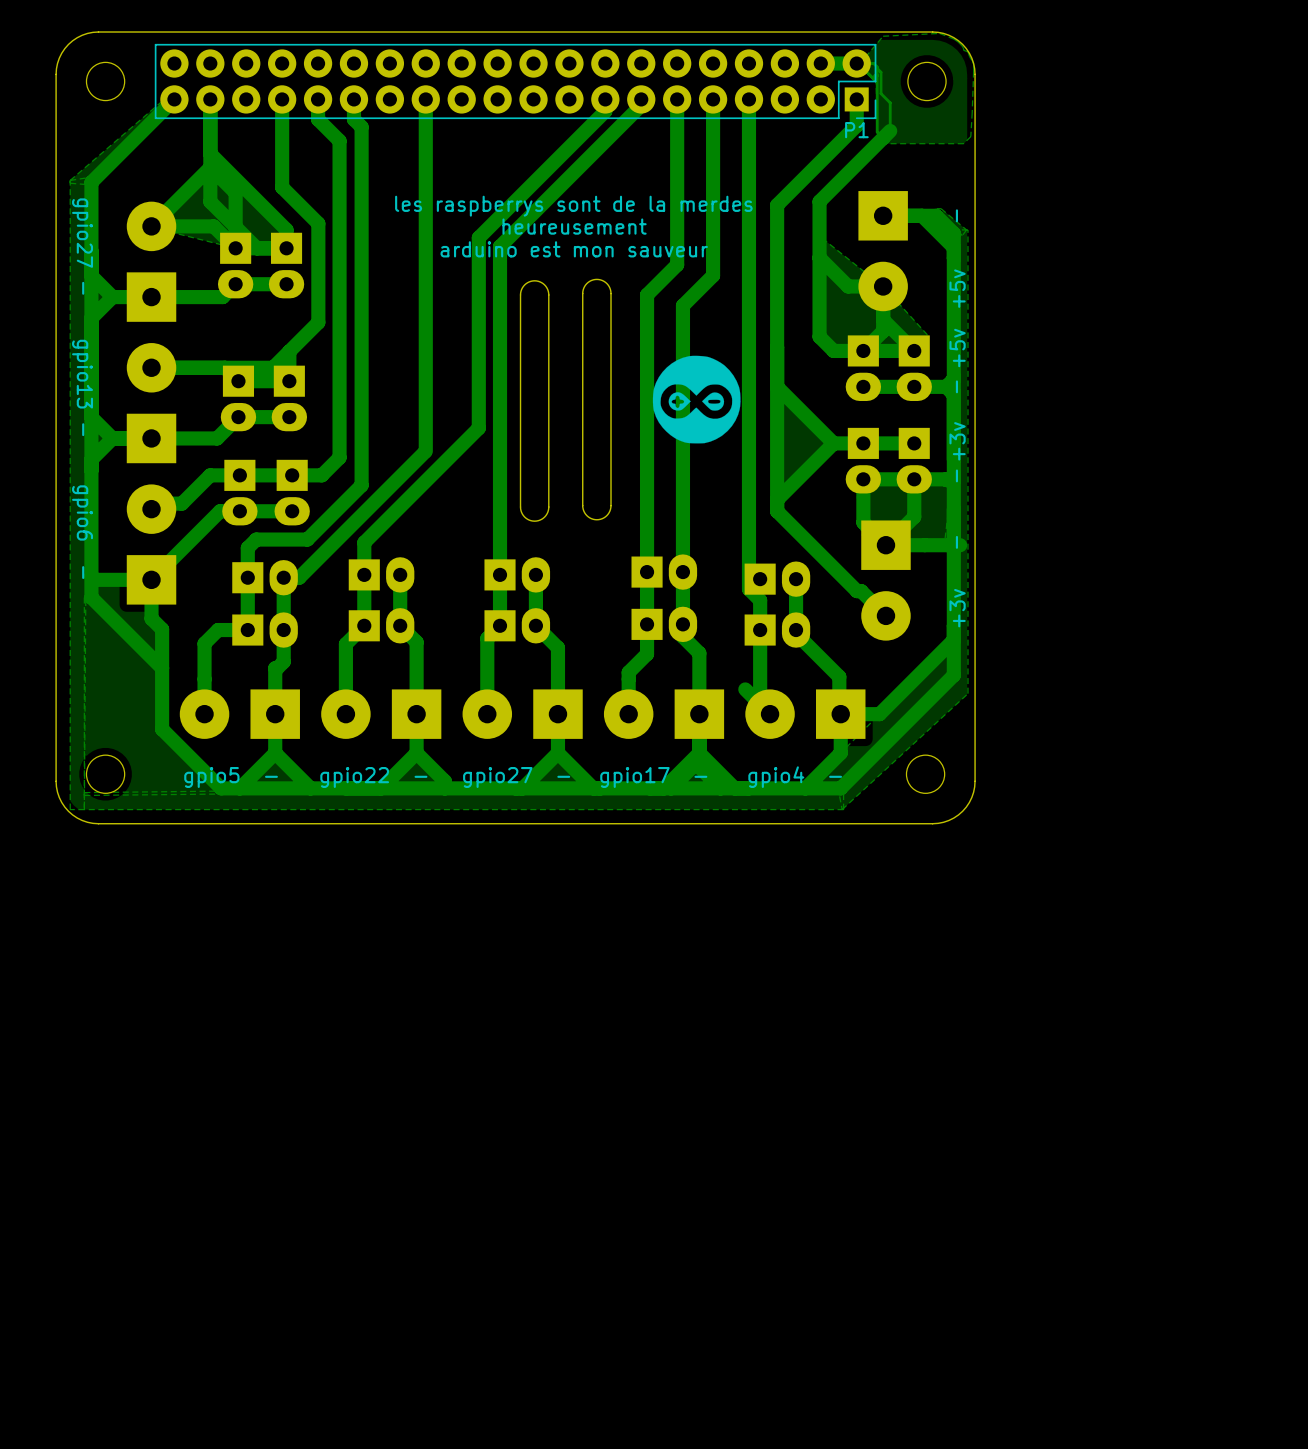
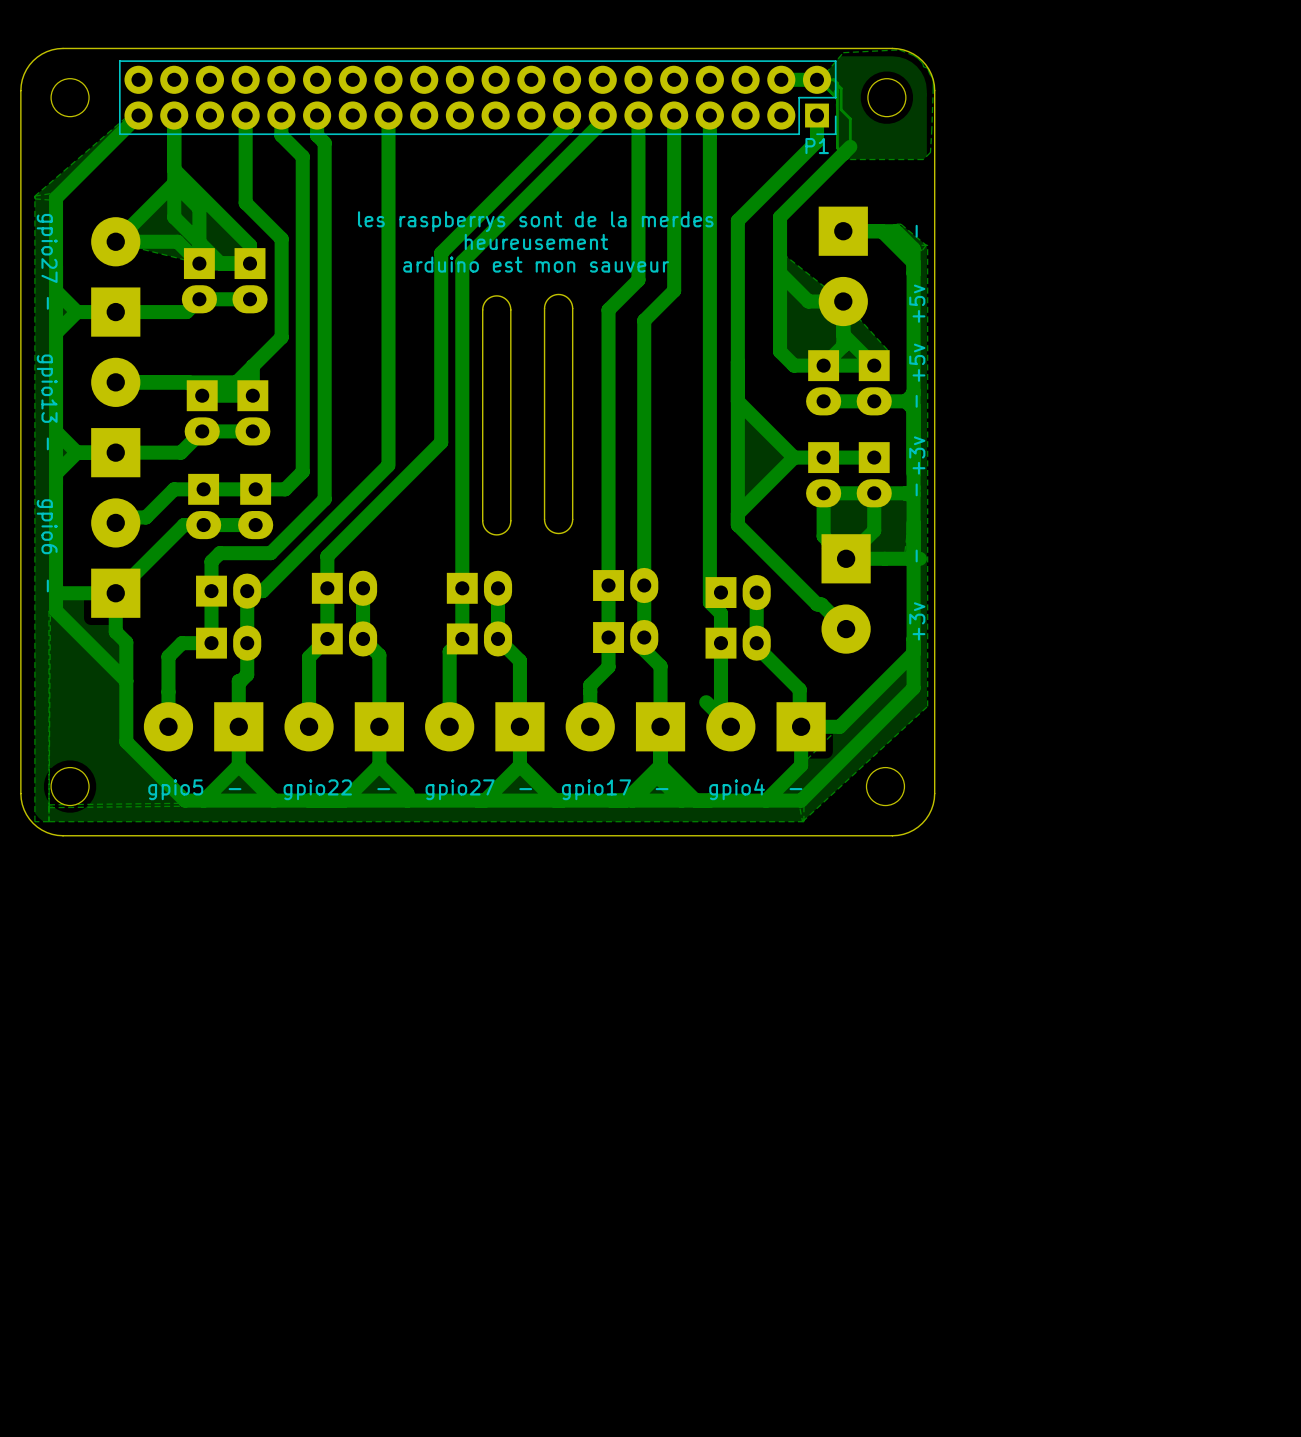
drawing: [652, 355, 741, 444] -> none

